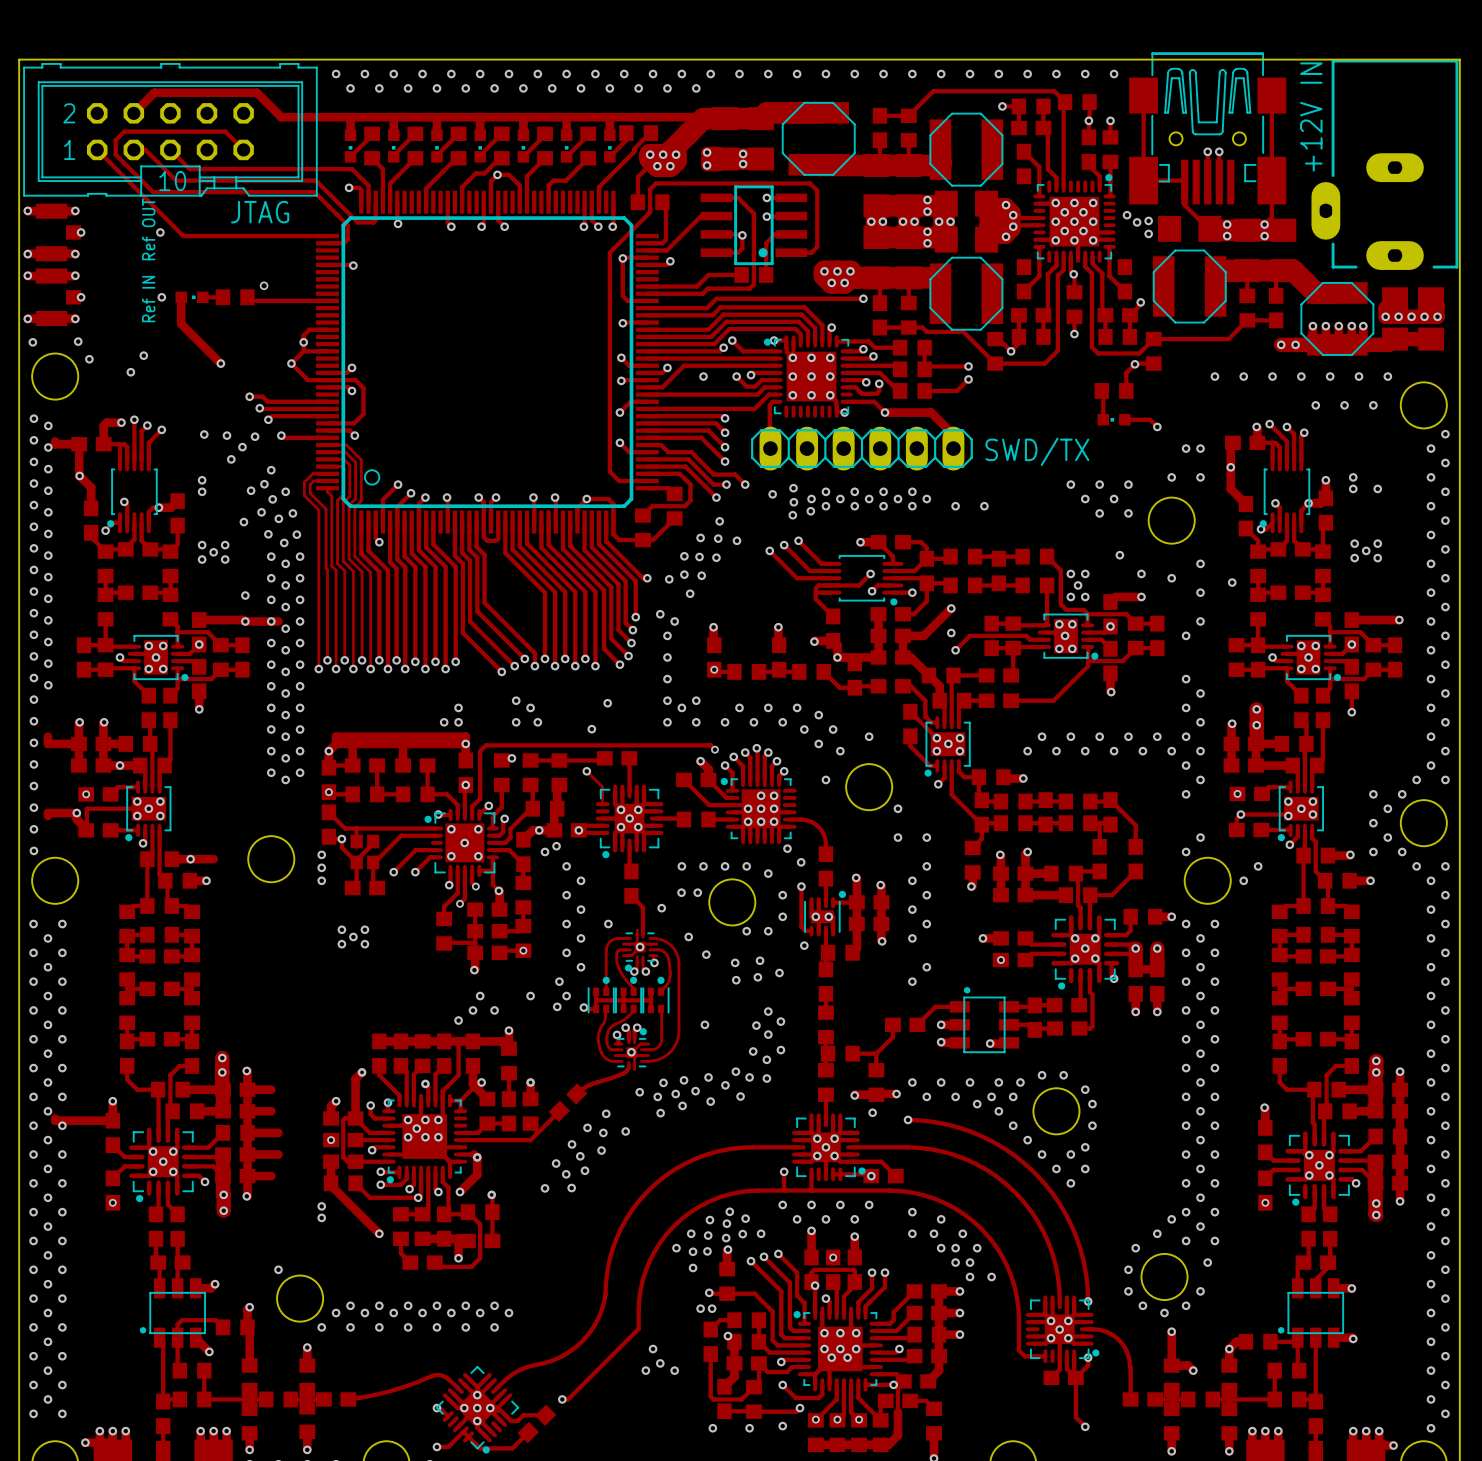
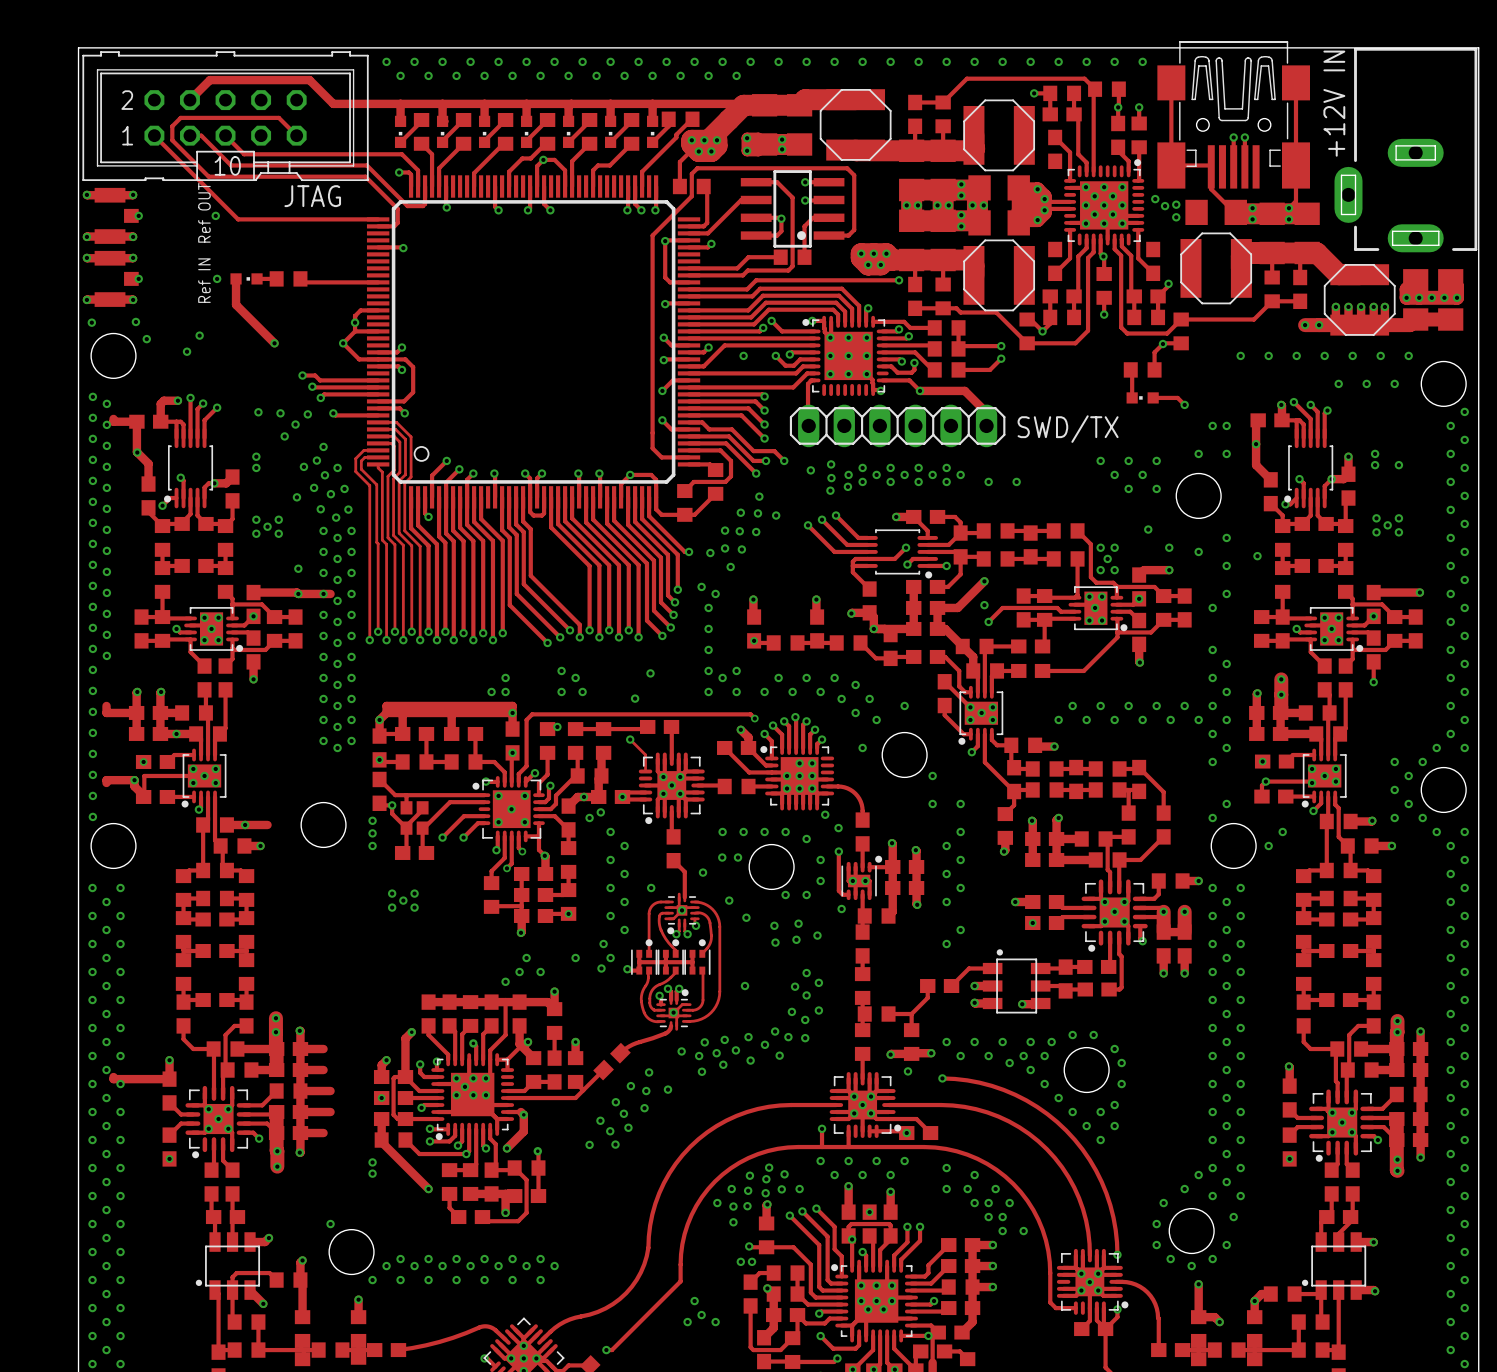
via: (264, 285) -> none

